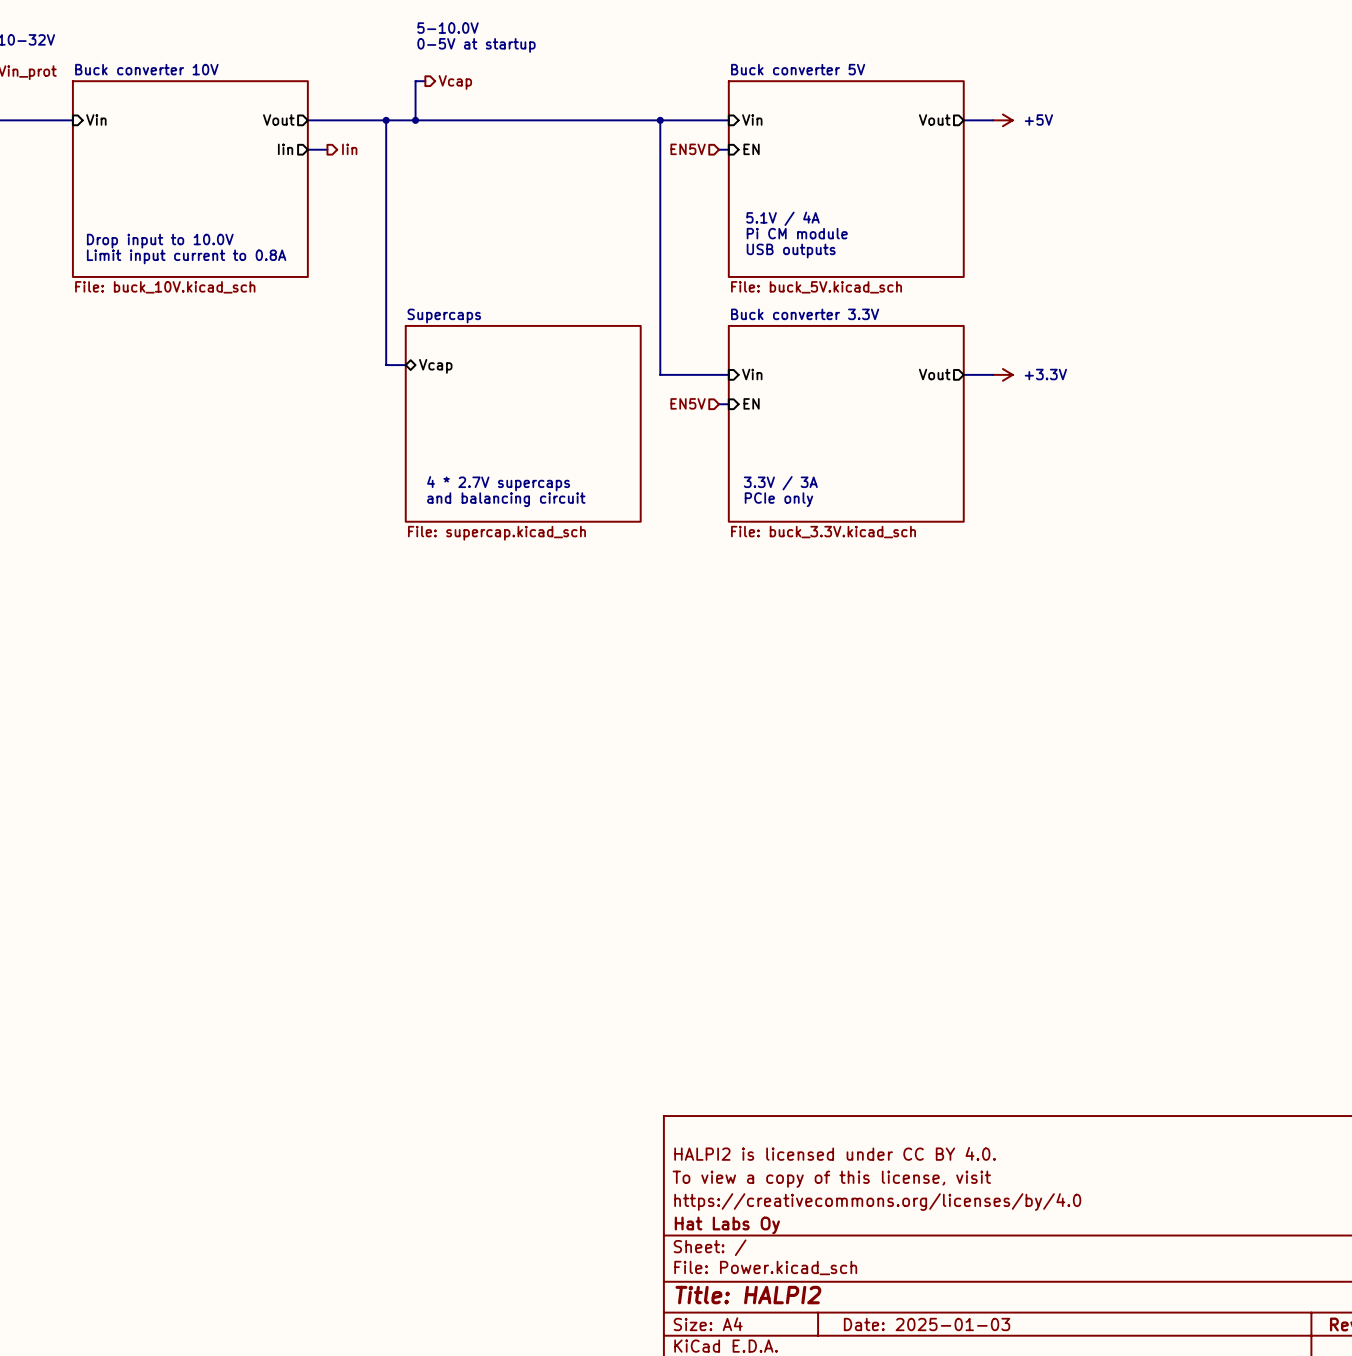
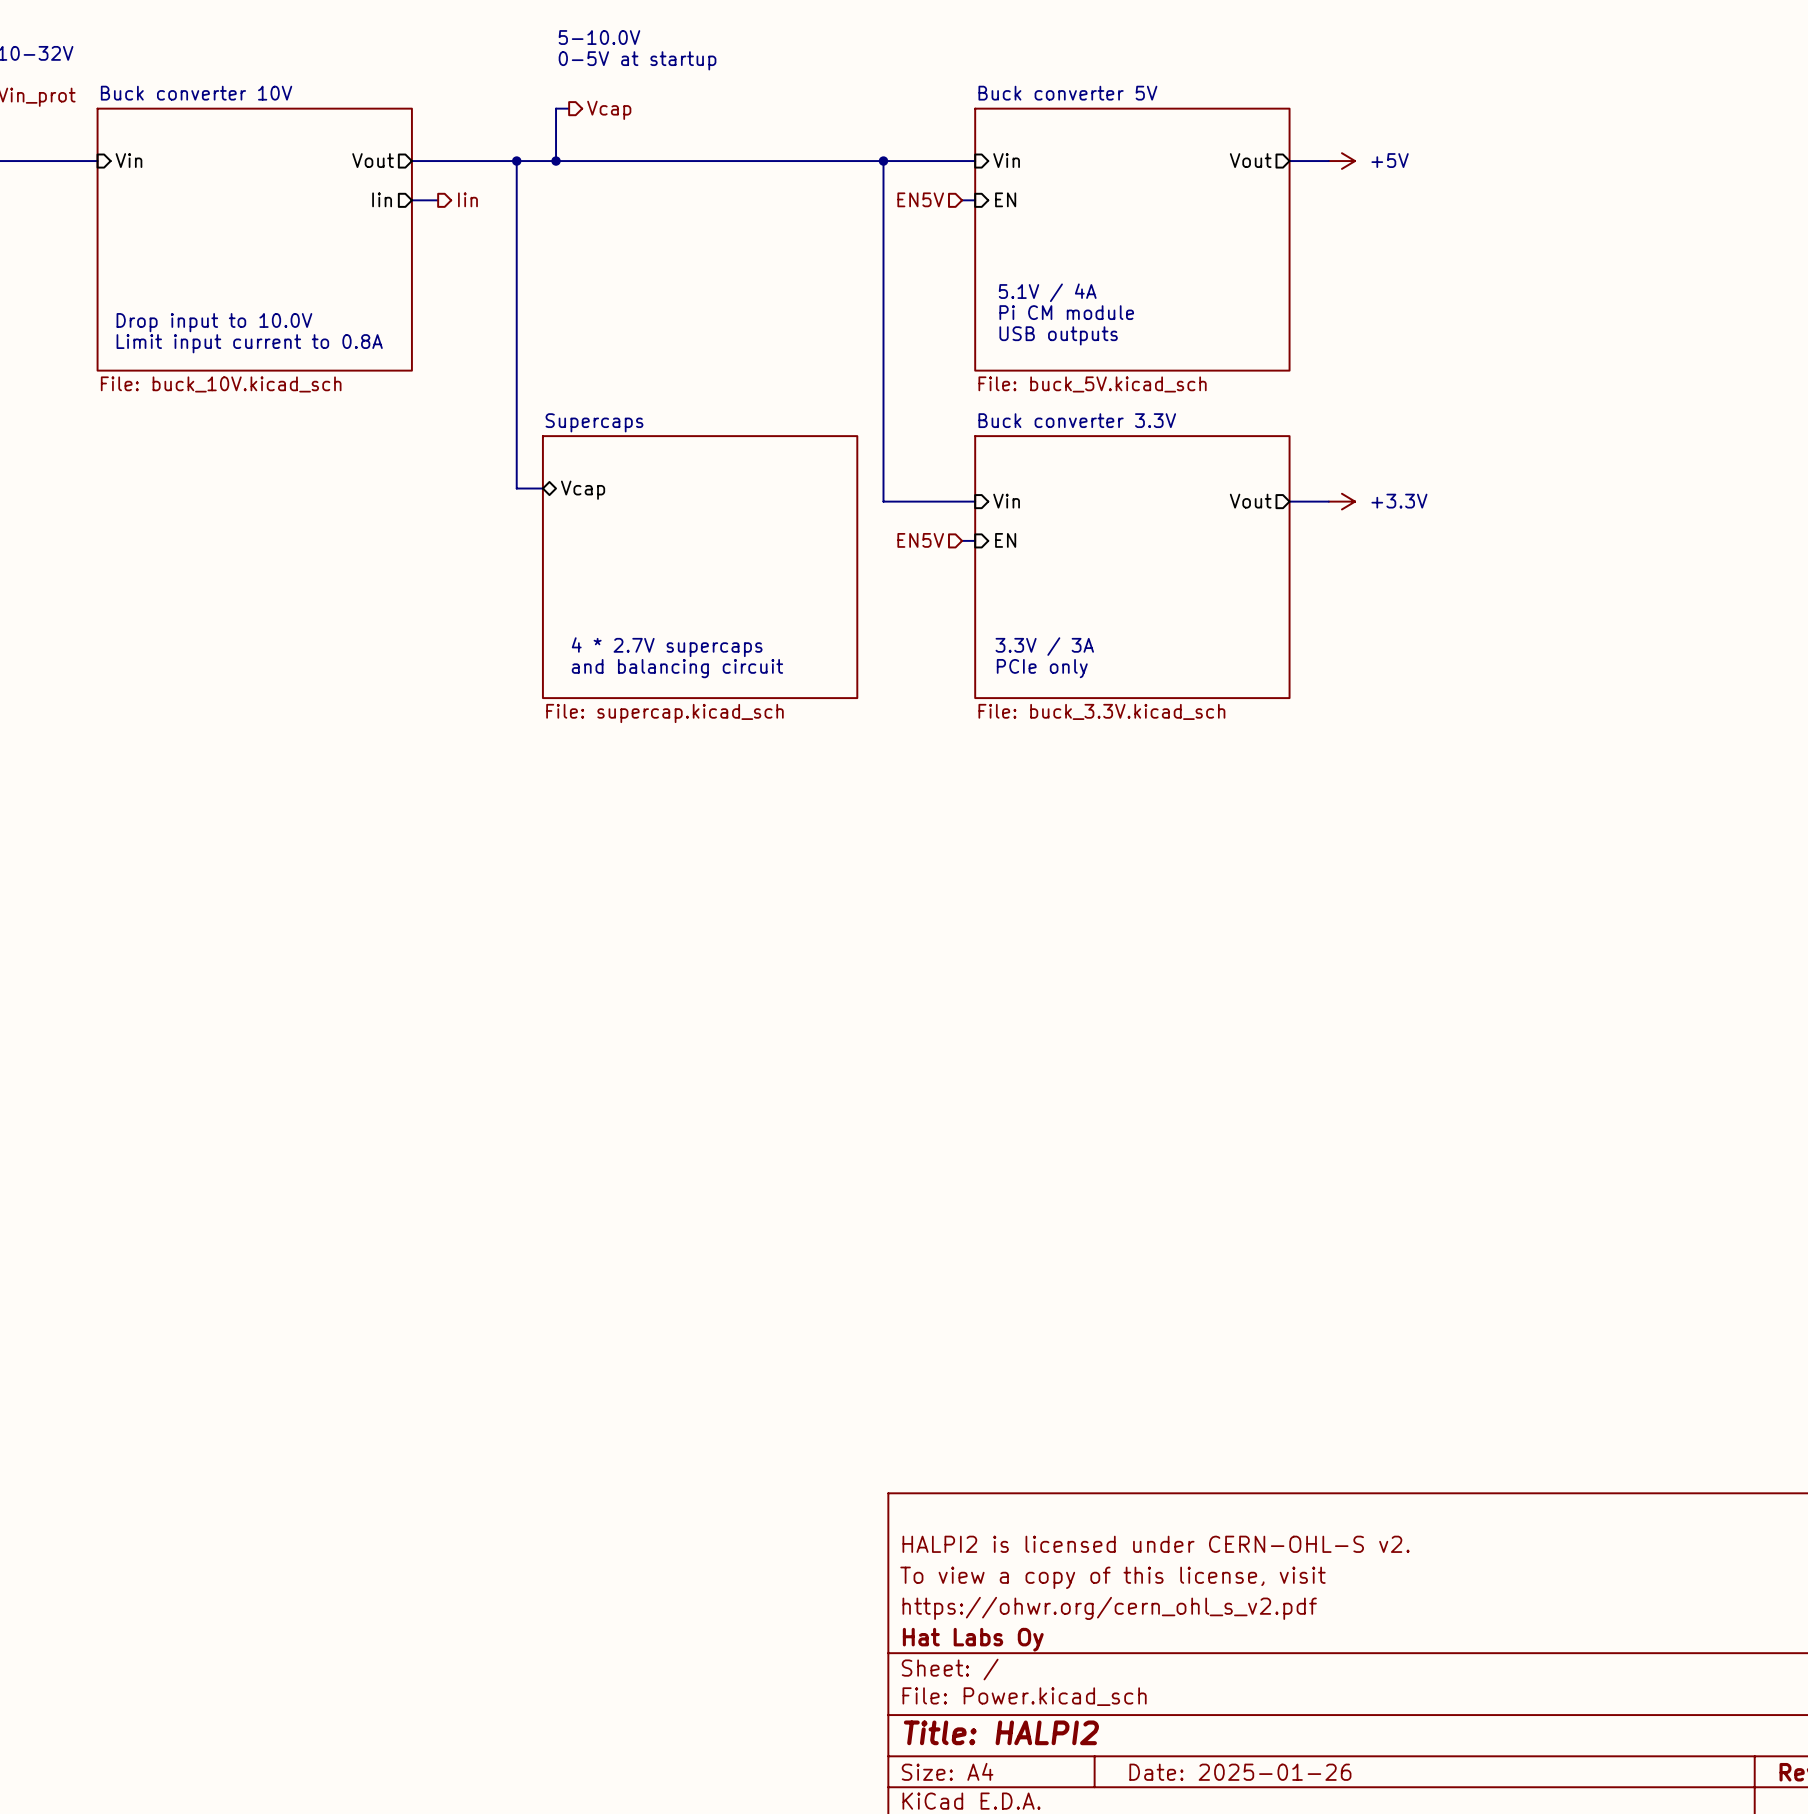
title block: HALPI2 is licensed under CC BY 4.0. (835, 1153) -> HALPI2 is licensed under CERN-OHL-S v2. (1156, 1544)
title block: https://creativecommons.org/licenses/by/4.0 (877, 1202) -> https://ohwr.org/cern_ohl_s_v2.pdf (1109, 1608)
title block: Date: 2025-01-03 (927, 1324) -> Date: 2025-01-26 (1240, 1772)

